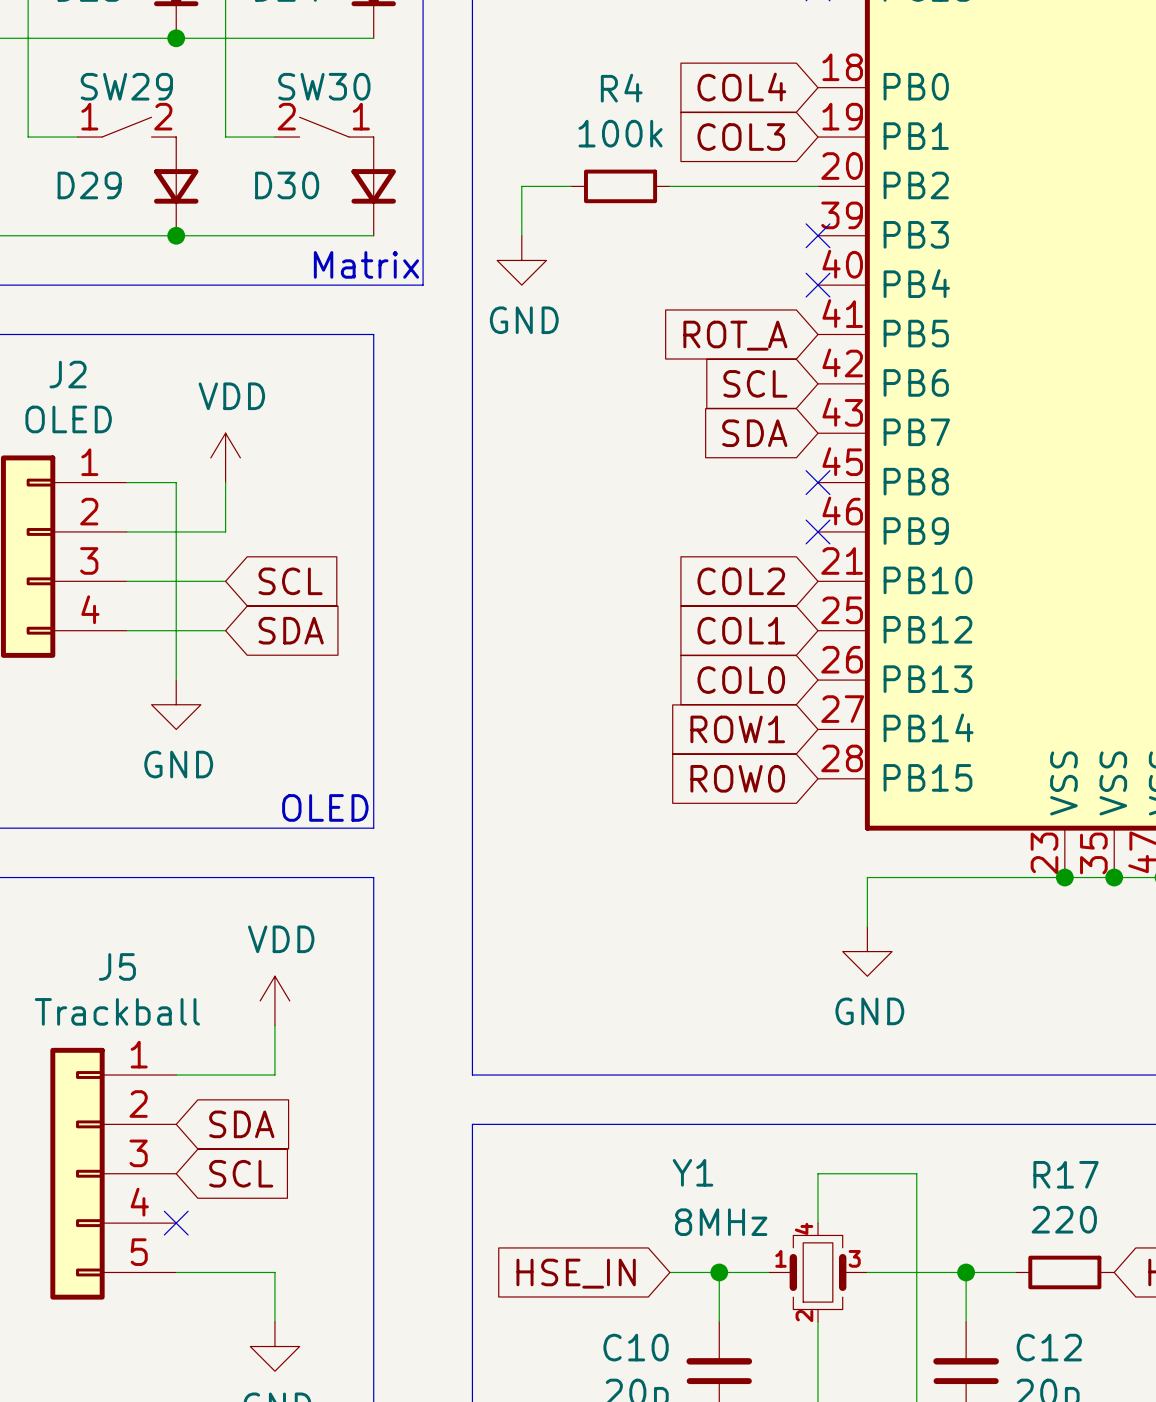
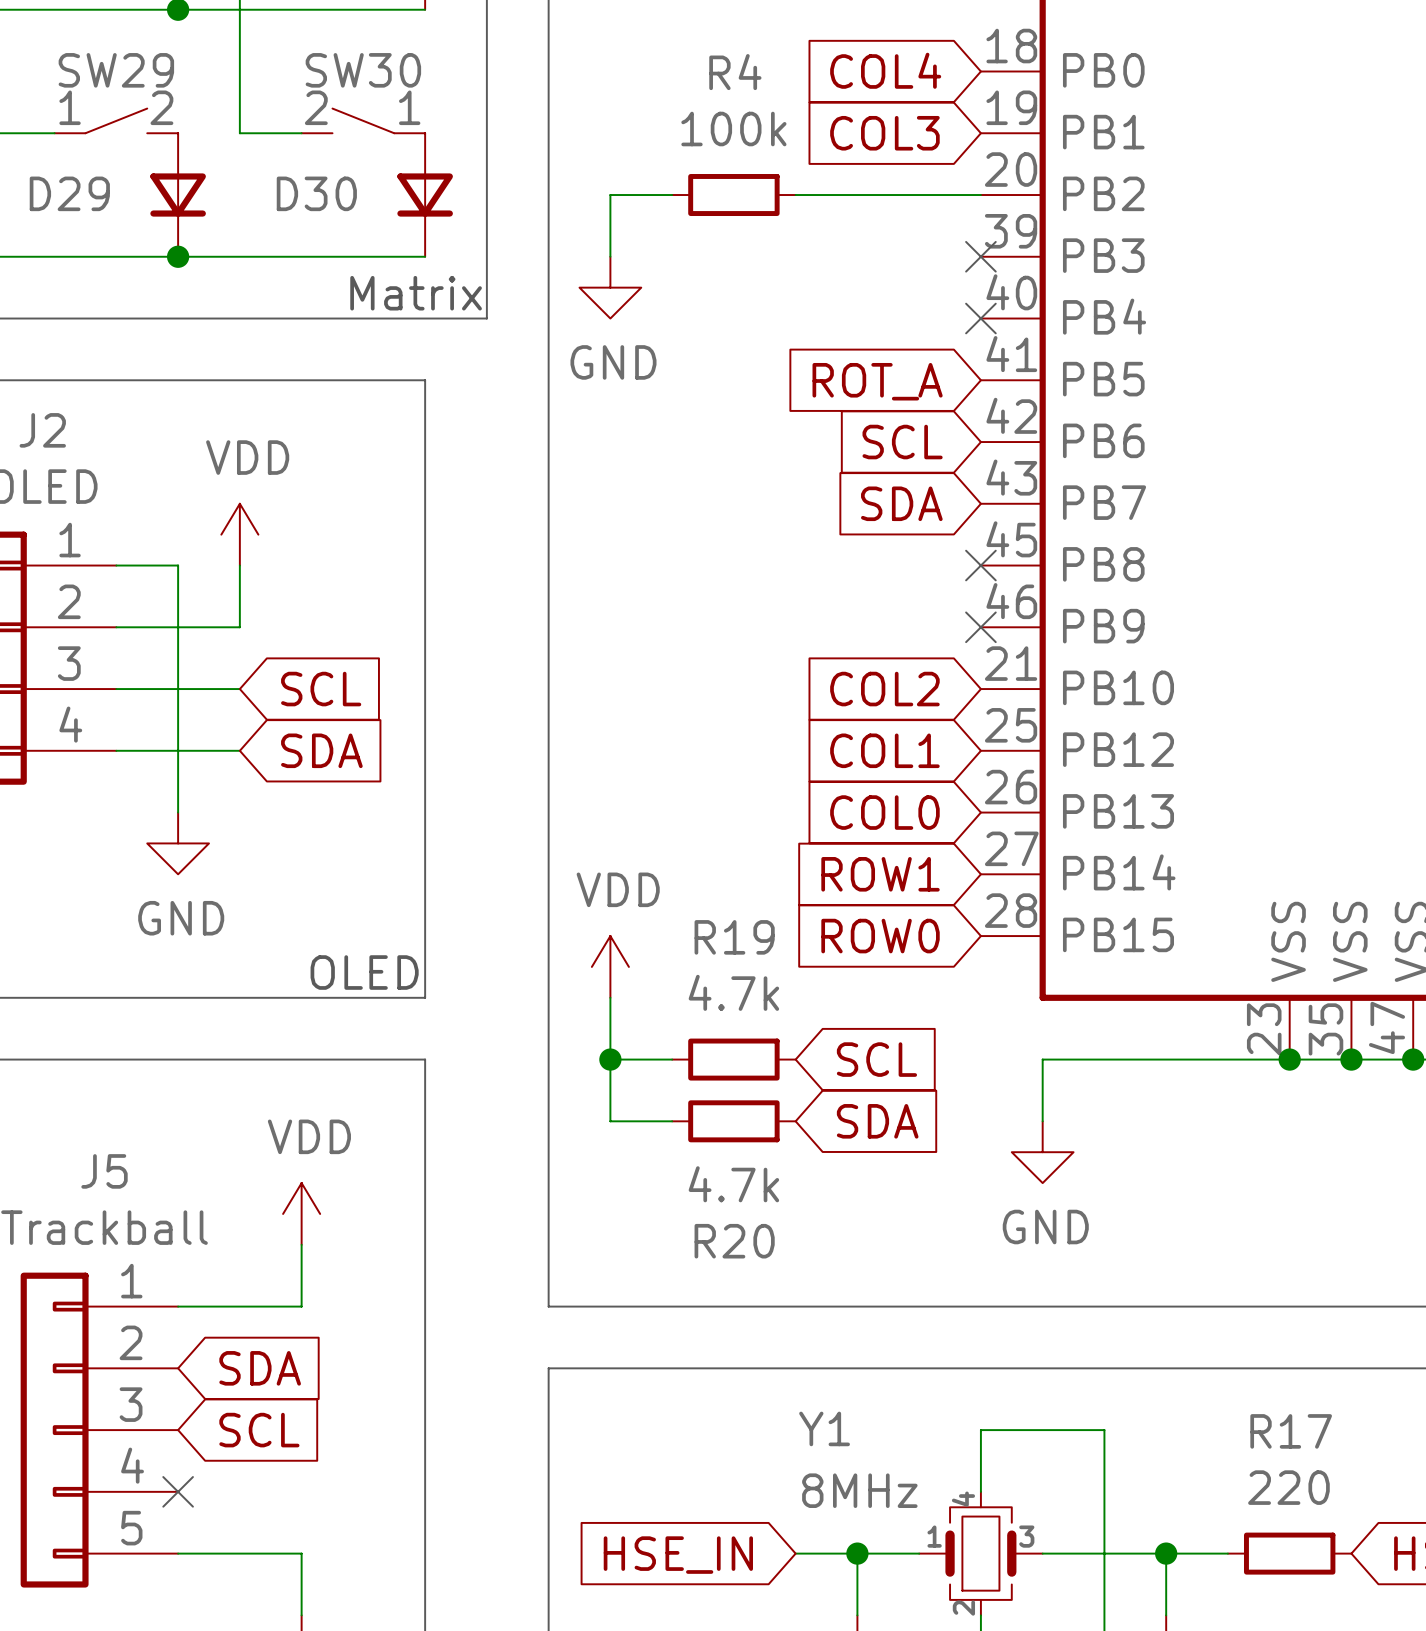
power symbol: none -> VDD (610, 966)
wire: none -> (610, 997) (610, 1121) (672, 1121)
wire: none -> (610, 1059) (672, 1059)
junction: none -> (610, 1059)
R19: none -> 4.7k (733, 1059)
global label: none -> SCL (876, 1059)
R20: none -> 4.7k (733, 1121)
global label: none -> SDA (877, 1121)

